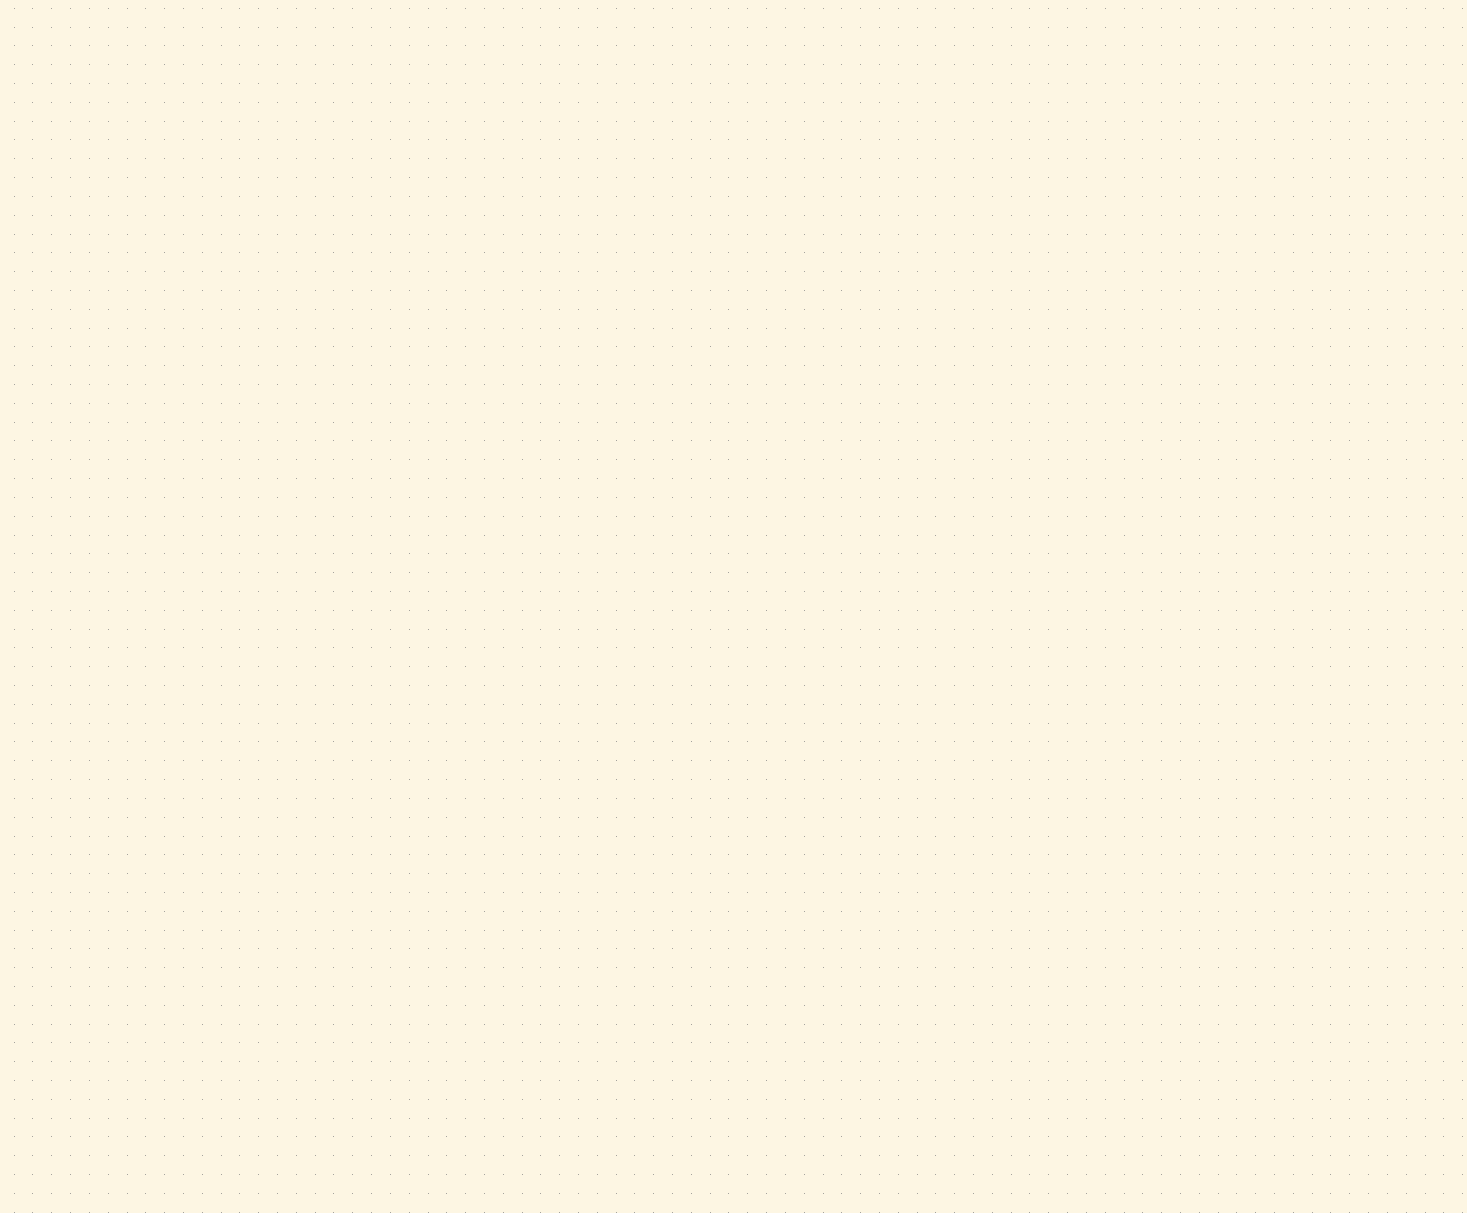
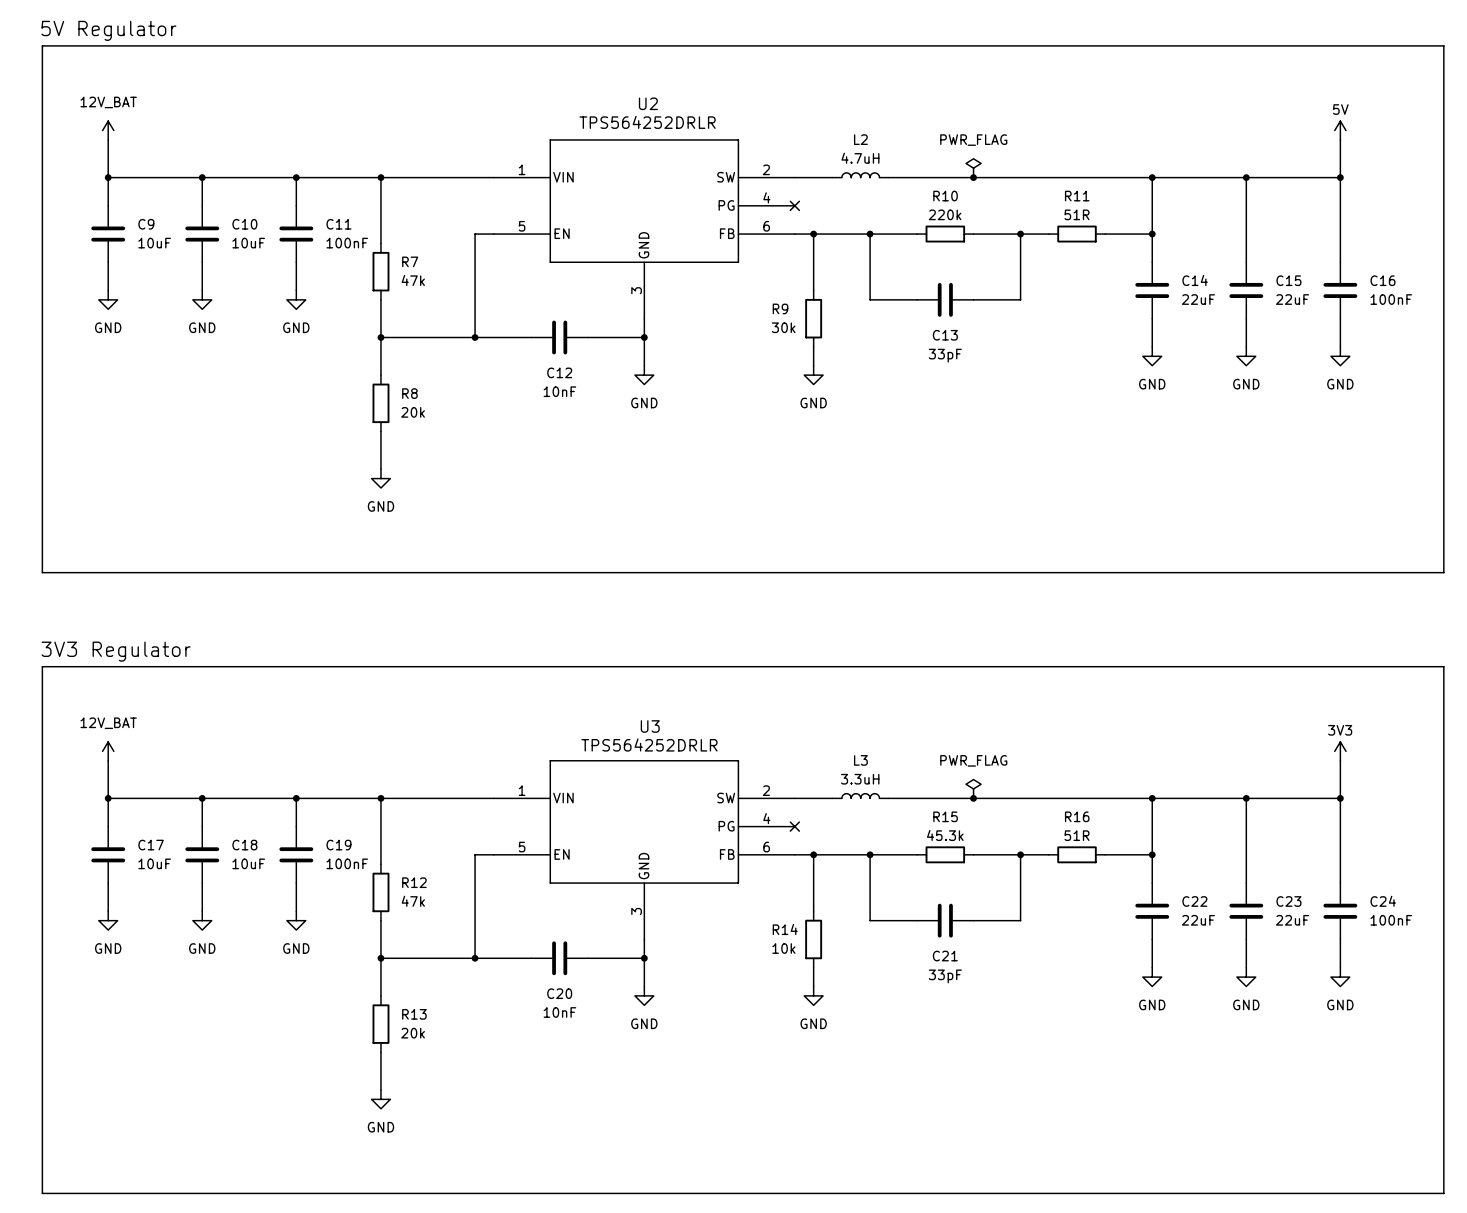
text: none -> 5V Regulator (108, 30)
line: none -> (42, 45) (1443, 45) (1443, 572) (42, 572) (42, 45)
power symbol: none -> 12V_BAT (108, 130)
power symbol: none -> 5V (1340, 130)
wire: none -> (108, 139) (108, 205)
wire: none -> (1340, 139) (1340, 262)
power symbol: none -> PWR_FLAG (973, 168)
L2: none -> 4.7uH (860, 175)
wire: none -> (108, 177) (493, 177)
junction: none -> (108, 177)
wire: none -> (202, 177) (202, 205)
junction: none -> (202, 177)
wire: none -> (296, 177) (296, 205)
junction: none -> (296, 177)
wire: none -> (380, 177) (380, 243)
junction: none -> (380, 177)
wire: none -> (794, 177) (832, 177)
wire: none -> (888, 177) (1340, 177)
junction: none -> (973, 177)
wire: none -> (1152, 177) (1152, 262)
junction: none -> (1152, 177)
wire: none -> (1246, 177) (1246, 262)
junction: none -> (1246, 177)
junction: none -> (1340, 177)
no-connect mark: none -> (794, 205)
U2: none -> TPS564252DRLR (644, 229)
C9: none -> 10uF (108, 234)
C10: none -> 10uF (202, 234)
C11: none -> 100nF (296, 234)
wire: none -> (493, 234) (475, 234) (475, 337)
wire: none -> (794, 234) (917, 234)
wire: none -> (813, 234) (813, 290)
junction: none -> (813, 234)
wire: none -> (870, 234) (870, 299) (917, 299)
junction: none -> (870, 234)
R10: none -> 220k (945, 234)
wire: none -> (973, 234) (1048, 234)
wire: none -> (1020, 234) (1020, 299) (973, 299)
junction: none -> (1020, 234)
R11: none -> 51R (1077, 234)
wire: none -> (1105, 234) (1152, 234)
junction: none -> (1152, 234)
wire: none -> (108, 262) (108, 290)
wire: none -> (202, 262) (202, 290)
wire: none -> (296, 262) (296, 290)
R7: none -> 47k (380, 271)
C14: none -> 22uF (1152, 290)
C15: none -> 22uF (1246, 290)
C16: none -> 100nF (1340, 290)
power symbol: none -> GND (108, 299)
power symbol: none -> GND (202, 299)
power symbol: none -> GND (296, 299)
wire: none -> (380, 299) (380, 375)
C13: none -> 33pF (945, 299)
wire: none -> (644, 318) (644, 365)
R9: none -> 30k (813, 318)
wire: none -> (1152, 318) (1152, 346)
wire: none -> (1246, 318) (1246, 346)
wire: none -> (1340, 318) (1340, 346)
wire: none -> (380, 337) (531, 337)
junction: none -> (380, 337)
junction: none -> (475, 337)
C12: none -> 10nF (559, 337)
wire: none -> (587, 337) (644, 337)
junction: none -> (644, 337)
wire: none -> (813, 346) (813, 365)
power symbol: none -> GND (1152, 356)
power symbol: none -> GND (1246, 356)
power symbol: none -> GND (1340, 356)
power symbol: none -> GND (644, 375)
power symbol: none -> GND (813, 375)
R8: none -> 20k (380, 403)
wire: none -> (380, 431) (380, 469)
power symbol: none -> GND (380, 478)
text: none -> 3V3 Regulator (116, 651)
line: none -> (42, 666) (42, 1193) (1443, 1193) (1443, 666) (42, 666)
power symbol: none -> 12V_BAT (108, 751)
power symbol: none -> 3V3 (1340, 751)
wire: none -> (108, 760) (108, 826)
wire: none -> (1340, 760) (1340, 883)
power symbol: none -> PWR_FLAG (973, 788)
L3: none -> 3.3uH (860, 796)
wire: none -> (108, 798) (493, 798)
junction: none -> (108, 798)
wire: none -> (202, 798) (202, 826)
junction: none -> (202, 798)
wire: none -> (296, 798) (296, 826)
junction: none -> (296, 798)
wire: none -> (380, 798) (380, 864)
junction: none -> (380, 798)
wire: none -> (794, 798) (832, 798)
wire: none -> (888, 798) (1340, 798)
junction: none -> (973, 798)
wire: none -> (1152, 798) (1152, 883)
junction: none -> (1152, 798)
wire: none -> (1246, 798) (1246, 883)
junction: none -> (1246, 798)
junction: none -> (1340, 798)
no-connect mark: none -> (794, 826)
U3: none -> TPS564252DRLR (644, 849)
C17: none -> 10uF (108, 854)
C18: none -> 10uF (202, 854)
C19: none -> 100nF (296, 854)
wire: none -> (493, 854) (475, 854) (475, 958)
wire: none -> (794, 854) (917, 854)
wire: none -> (813, 854) (813, 911)
junction: none -> (813, 854)
wire: none -> (870, 854) (870, 920) (917, 920)
junction: none -> (870, 854)
R15: none -> 45.3k (945, 854)
wire: none -> (973, 854) (1048, 854)
wire: none -> (1020, 854) (1020, 920) (973, 920)
junction: none -> (1020, 854)
R16: none -> 51R (1077, 854)
wire: none -> (1105, 854) (1152, 854)
junction: none -> (1152, 854)
wire: none -> (108, 883) (108, 911)
wire: none -> (202, 883) (202, 911)
wire: none -> (296, 883) (296, 911)
R12: none -> 47k (380, 892)
C22: none -> 22uF (1152, 911)
C23: none -> 22uF (1246, 911)
C24: none -> 100nF (1340, 911)
power symbol: none -> GND (108, 920)
power symbol: none -> GND (202, 920)
power symbol: none -> GND (296, 920)
wire: none -> (380, 920) (380, 995)
C21: none -> 33pF (945, 920)
wire: none -> (644, 939) (644, 986)
R14: none -> 10k (813, 939)
wire: none -> (1152, 939) (1152, 967)
wire: none -> (1246, 939) (1246, 967)
wire: none -> (1340, 939) (1340, 967)
wire: none -> (380, 958) (531, 958)
junction: none -> (380, 958)
junction: none -> (475, 958)
C20: none -> 10nF (559, 958)
wire: none -> (587, 958) (644, 958)
junction: none -> (644, 958)
wire: none -> (813, 967) (813, 986)
power symbol: none -> GND (1152, 977)
power symbol: none -> GND (1246, 977)
power symbol: none -> GND (1340, 977)
power symbol: none -> GND (644, 995)
power symbol: none -> GND (813, 995)
R13: none -> 20k (380, 1024)
wire: none -> (380, 1052) (380, 1089)
power symbol: none -> GND (380, 1099)

